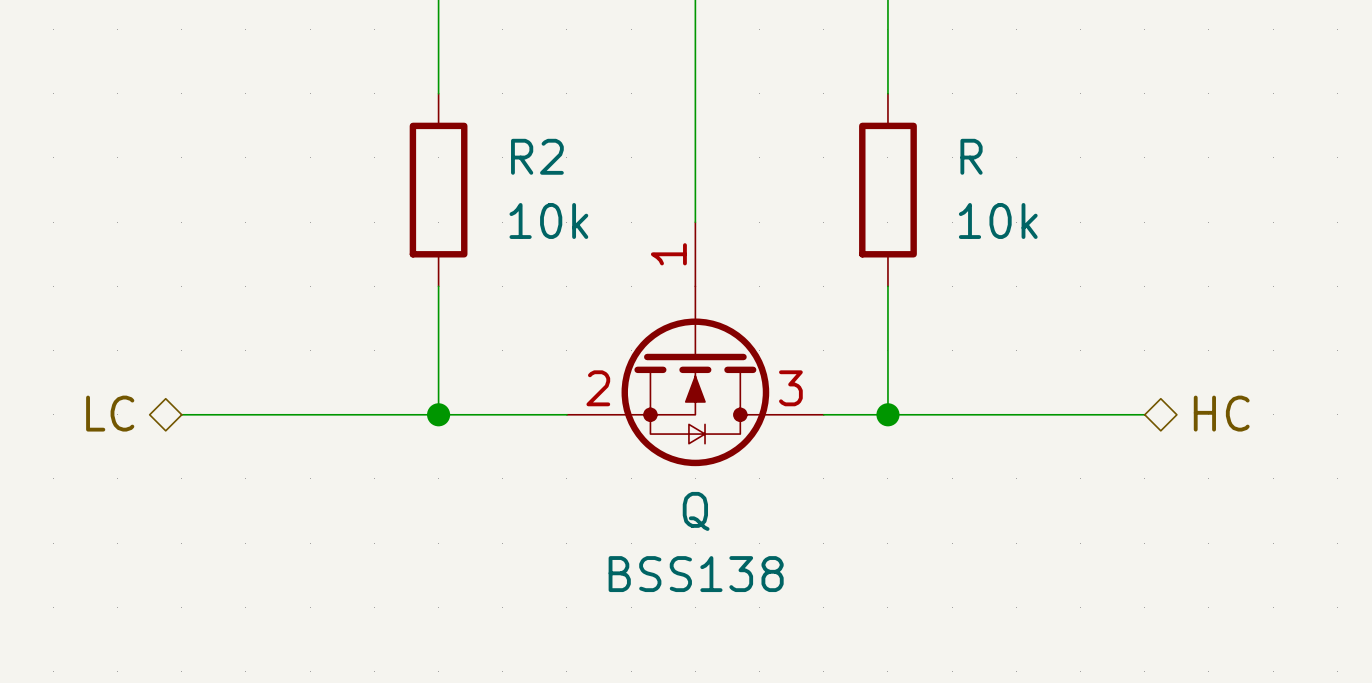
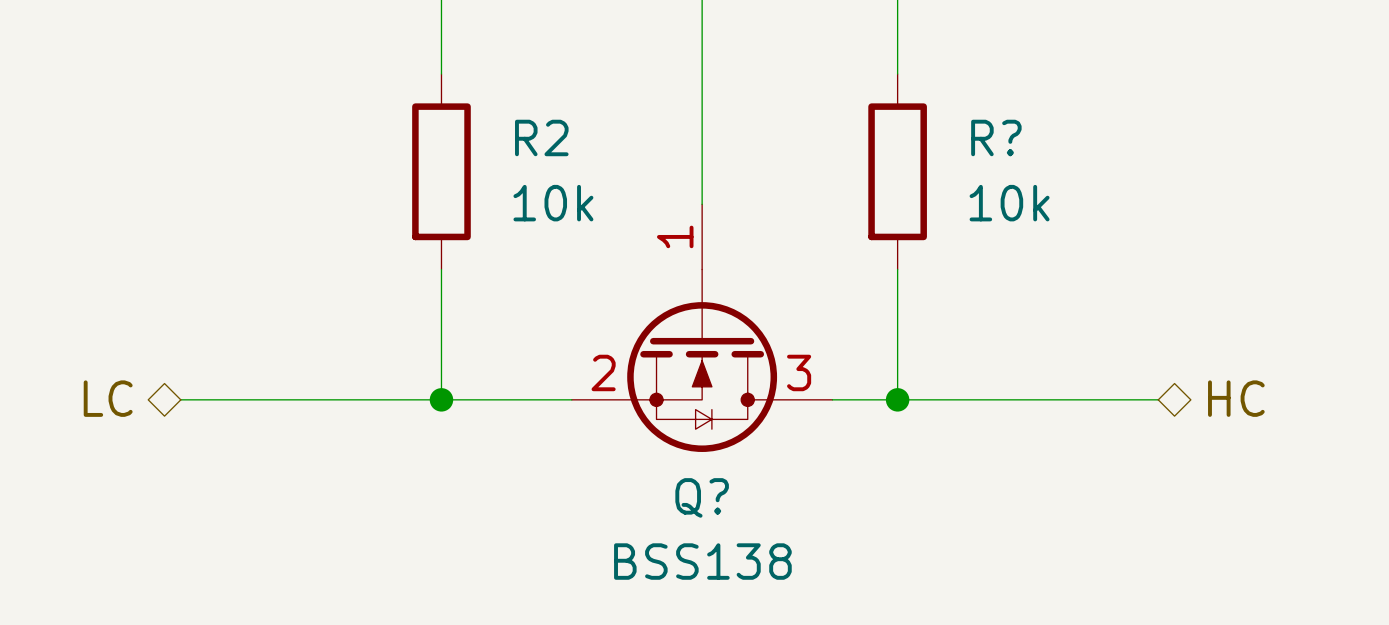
R name: R (971, 156) -> R? (996, 137)
Q name: Q (696, 511) -> Q? (702, 497)

